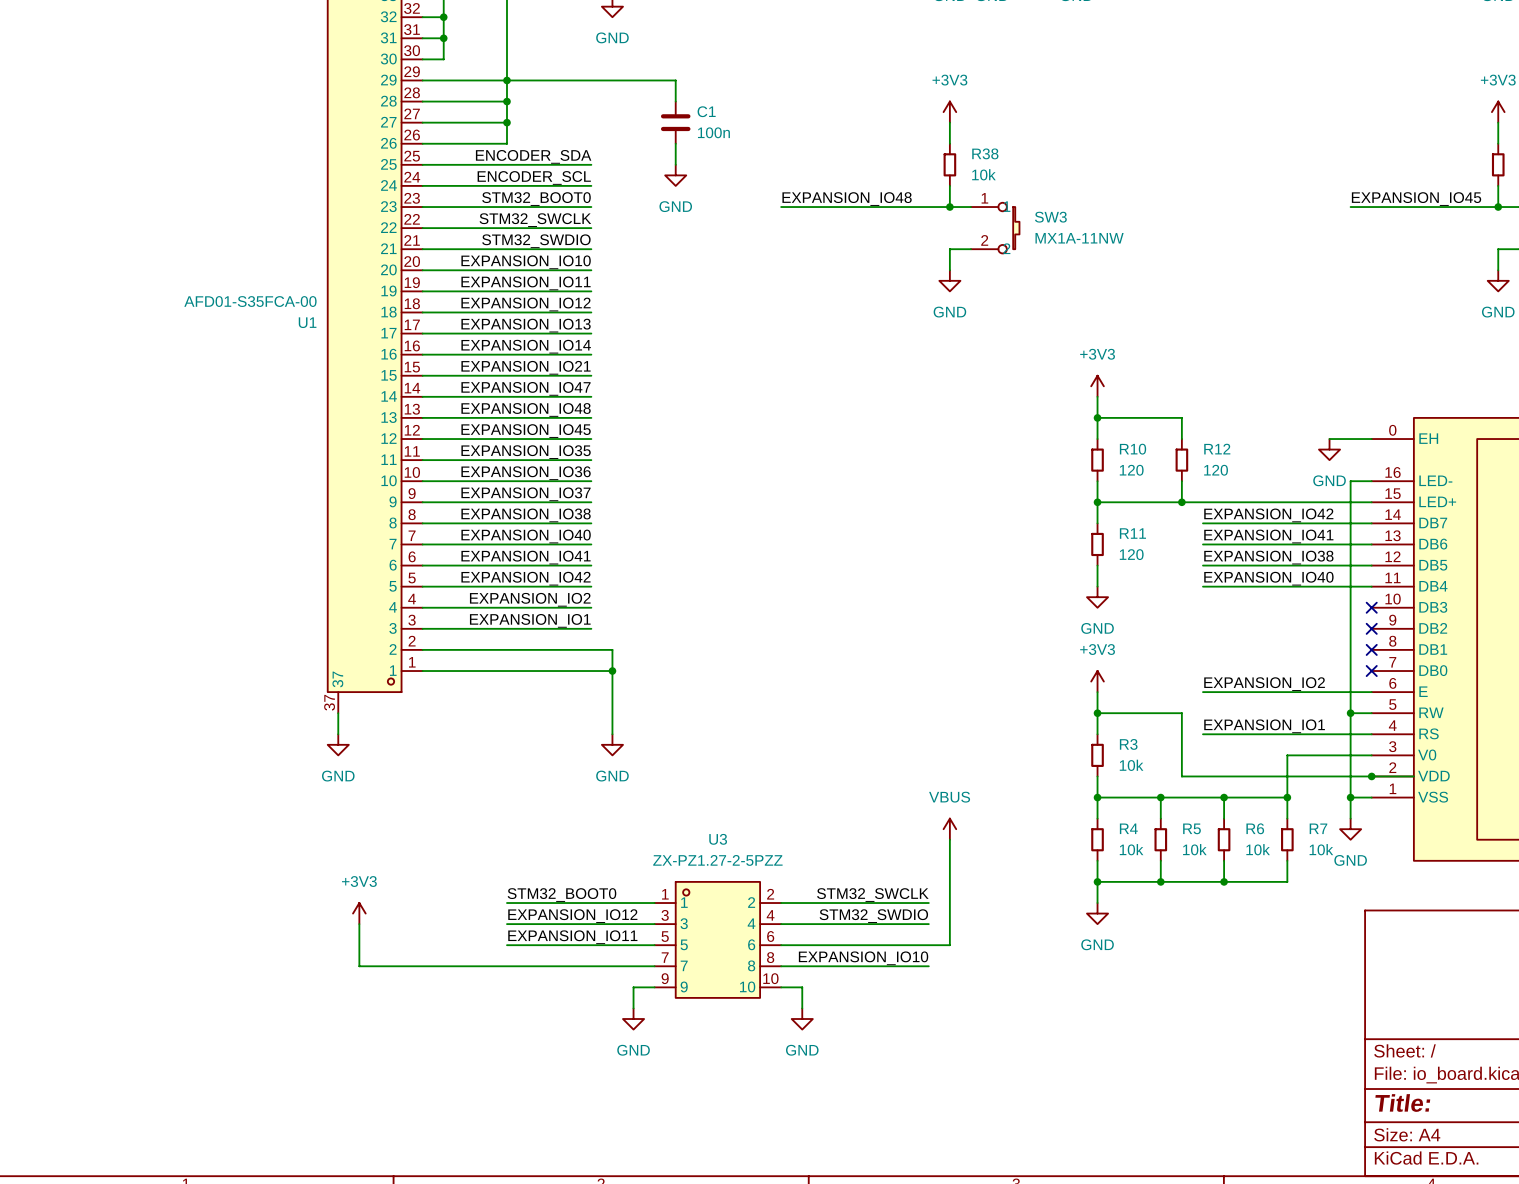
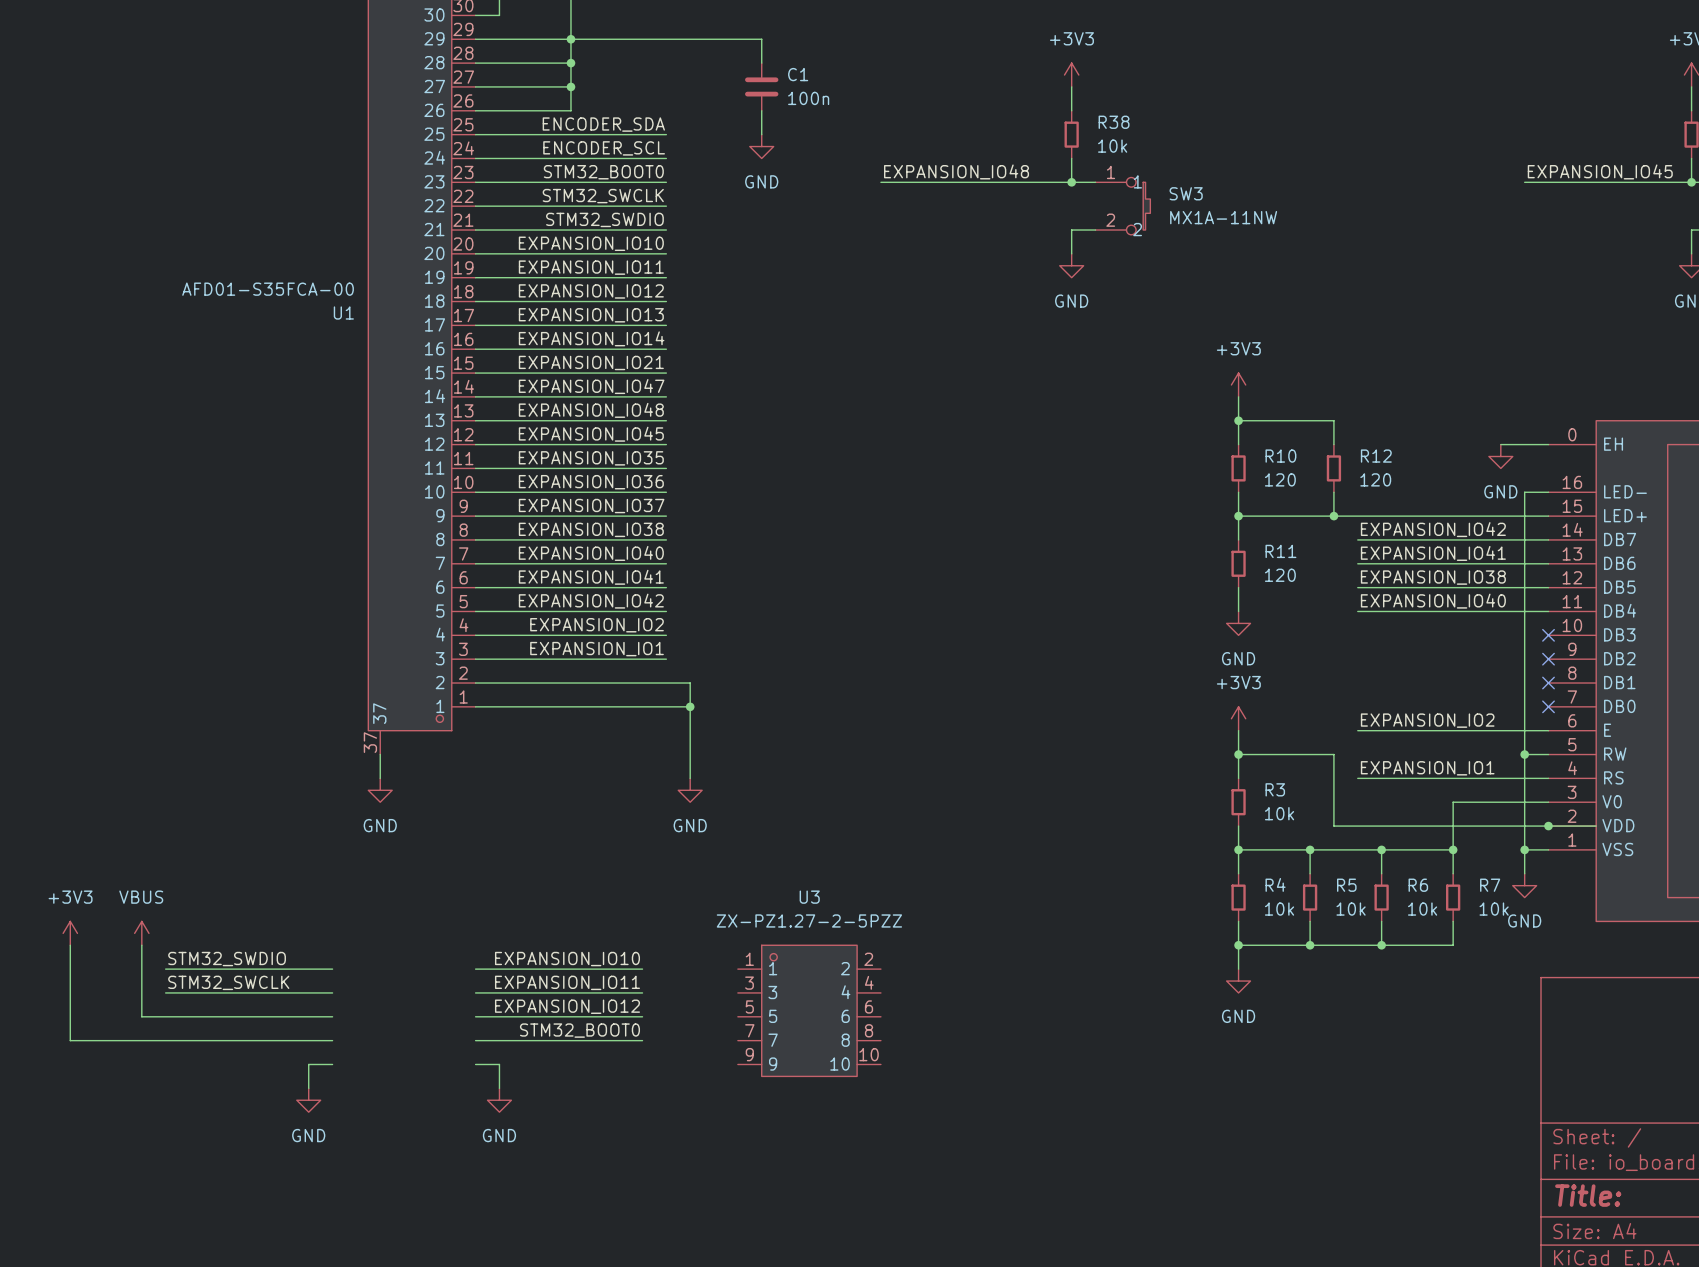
power symbol: VBUS (949, 829) -> none
wire: (949, 839) (949, 945) (781, 945) -> none
power symbol: none -> +3V3 (70, 933)
power symbol: none -> VBUS (141, 933)
wire: none -> (70, 945) (70, 1040) (332, 1040)
wire: none -> (141, 945) (141, 1016) (332, 1016)
label: none -> STM32_SWDIO (227, 959)
label: none -> EXPANSION_IO10 (567, 959)
label position: STM32_BOOT0 (561, 895) -> STM32_BOOT0 (579, 1030)
label: STM32_SWCLK (872, 895) -> none
wire: none -> (165, 969) (332, 969)
wire: (570, 903) (654, 903) -> (475, 969) (570, 969)
wire: (781, 903) (928, 903) -> none
power symbol: +3V3 (359, 913) -> none
label: none -> STM32_SWCLK (228, 982)
label position: EXPANSION_IO12 (572, 916) -> EXPANSION_IO12 (567, 1006)
label: STM32_SWDIO (873, 916) -> none
wire: none -> (165, 992) (332, 992)
wire: (359, 924) (359, 966) (422, 966) -> none
wire: (570, 924) (654, 924) -> (475, 992) (570, 992)
wire: (781, 924) (928, 924) -> none
label position: EXPANSION_IO11 (572, 937) -> EXPANSION_IO11 (567, 982)
wire: (570, 945) (654, 945) -> (475, 1016) (570, 1016)
label: EXPANSION_IO10 (863, 958) -> none
wire: (570, 966) (654, 966) -> none
wire: (781, 966) (928, 966) -> none
wire: none -> (332, 1064) (308, 1064) (308, 1088)
wire: none -> (475, 1064) (499, 1064) (499, 1088)
wire: (654, 987) (633, 987) (633, 1008) -> none
wire: (781, 987) (802, 987) (802, 1008) -> none
power symbol: none -> GND (308, 1100)
power symbol: none -> GND (499, 1100)
power symbol: GND (633, 1019) -> none
power symbol: GND (802, 1019) -> none

